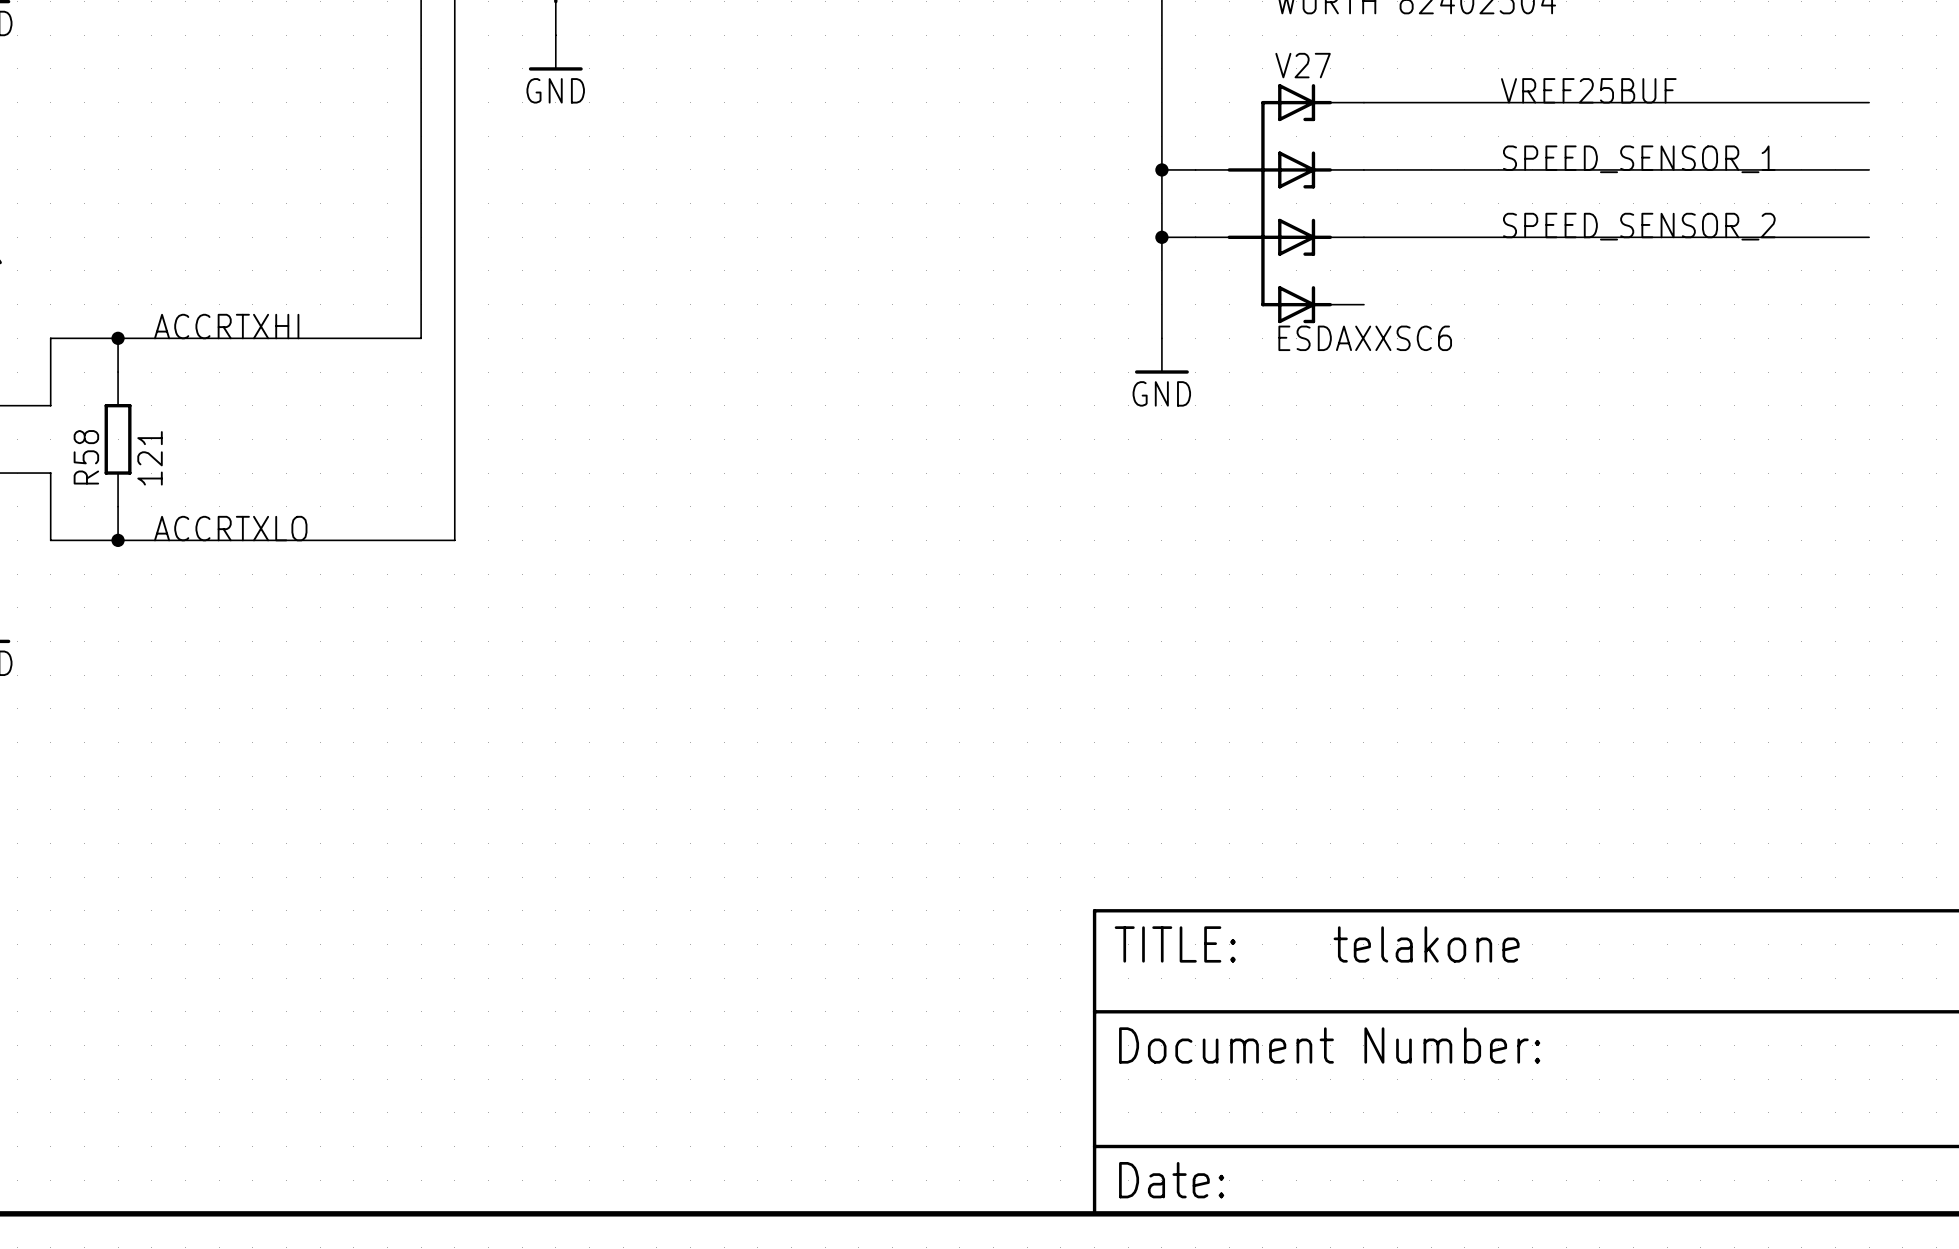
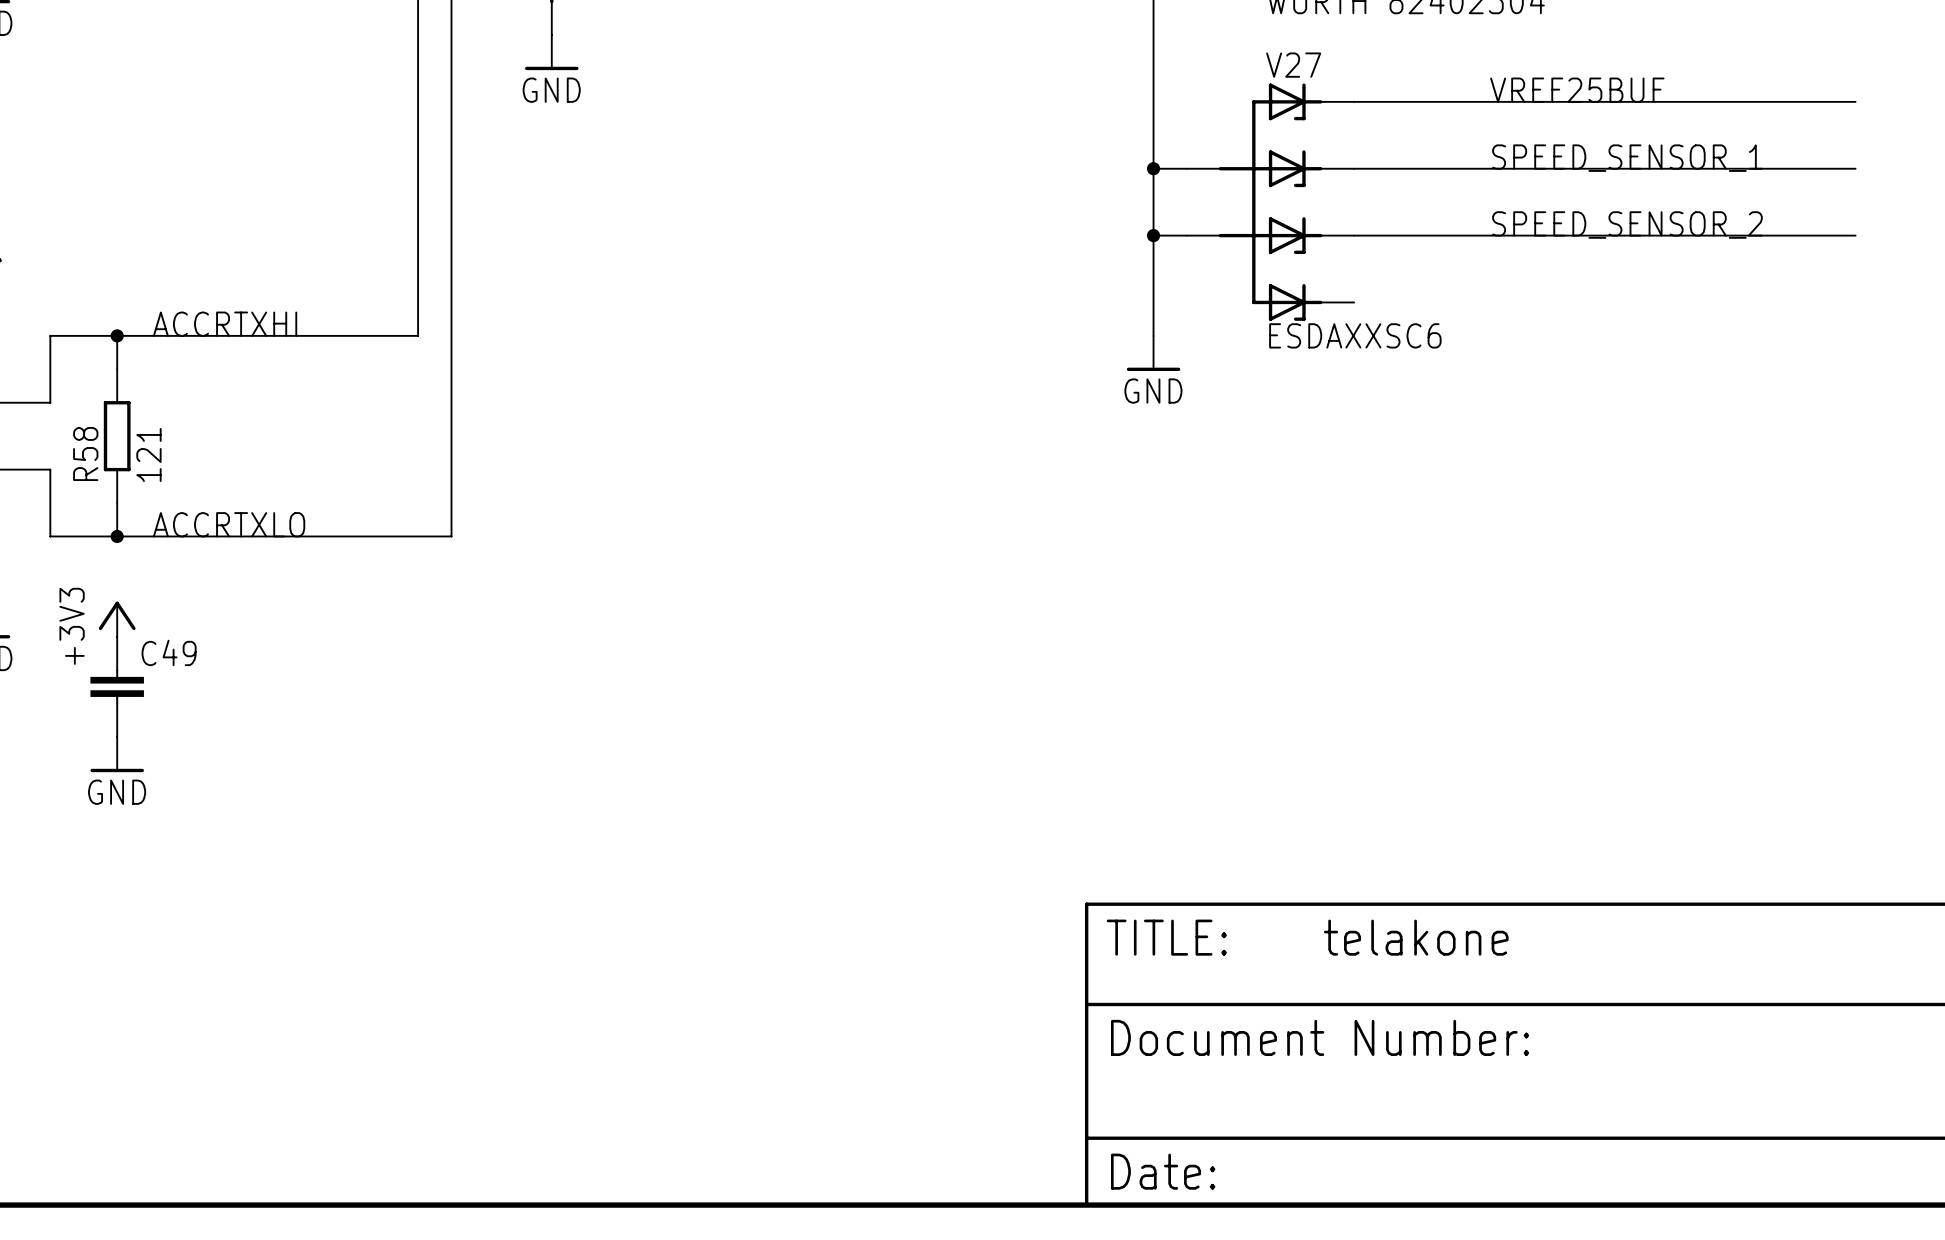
power symbol: none -> +3V3 (117, 619)
C49: none -> (117, 686)
power symbol: none -> GND (117, 754)

